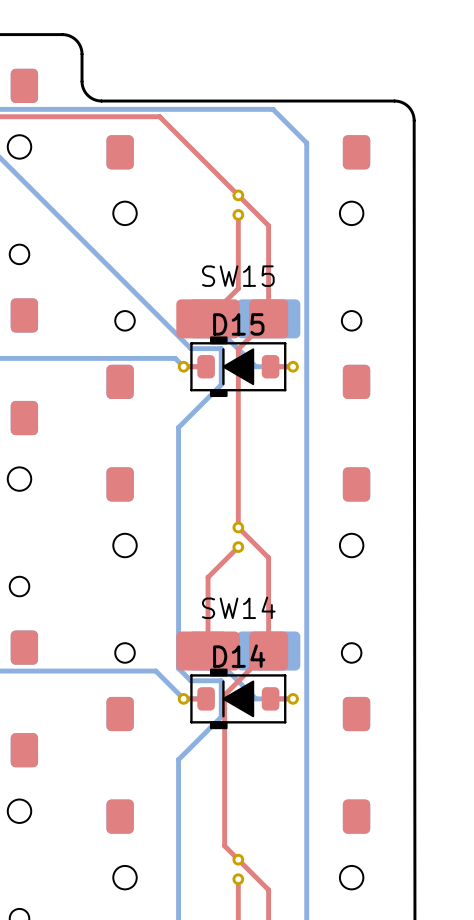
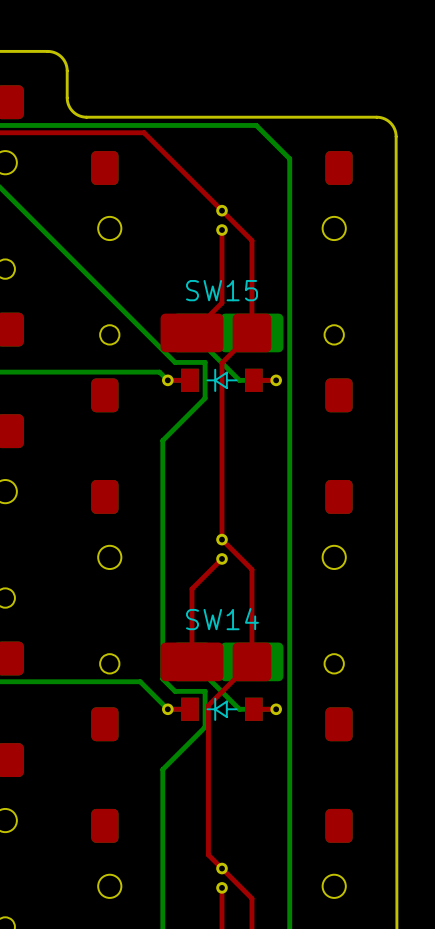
D15: (238, 366) -> none
part: none -> (221, 380)
D14: (238, 698) -> none
part: none -> (221, 709)

